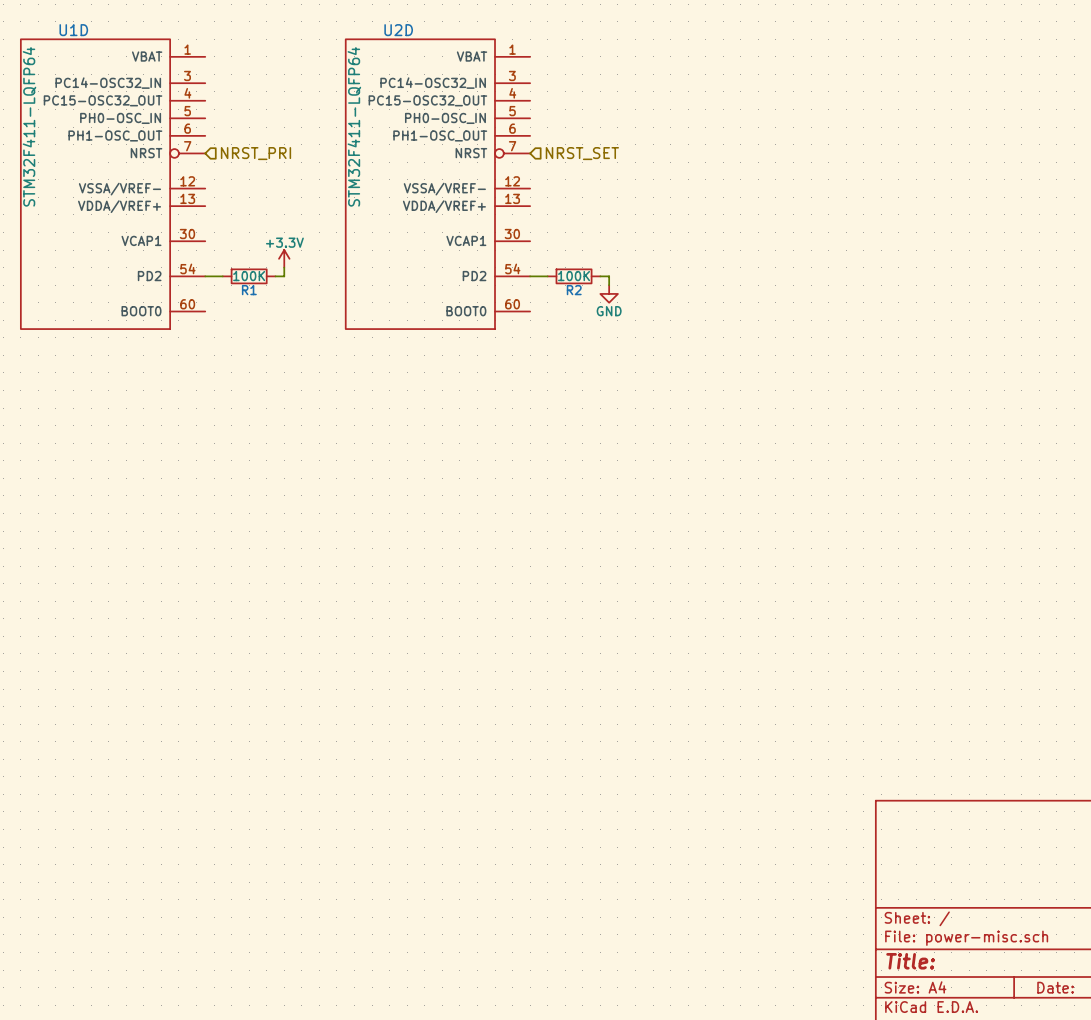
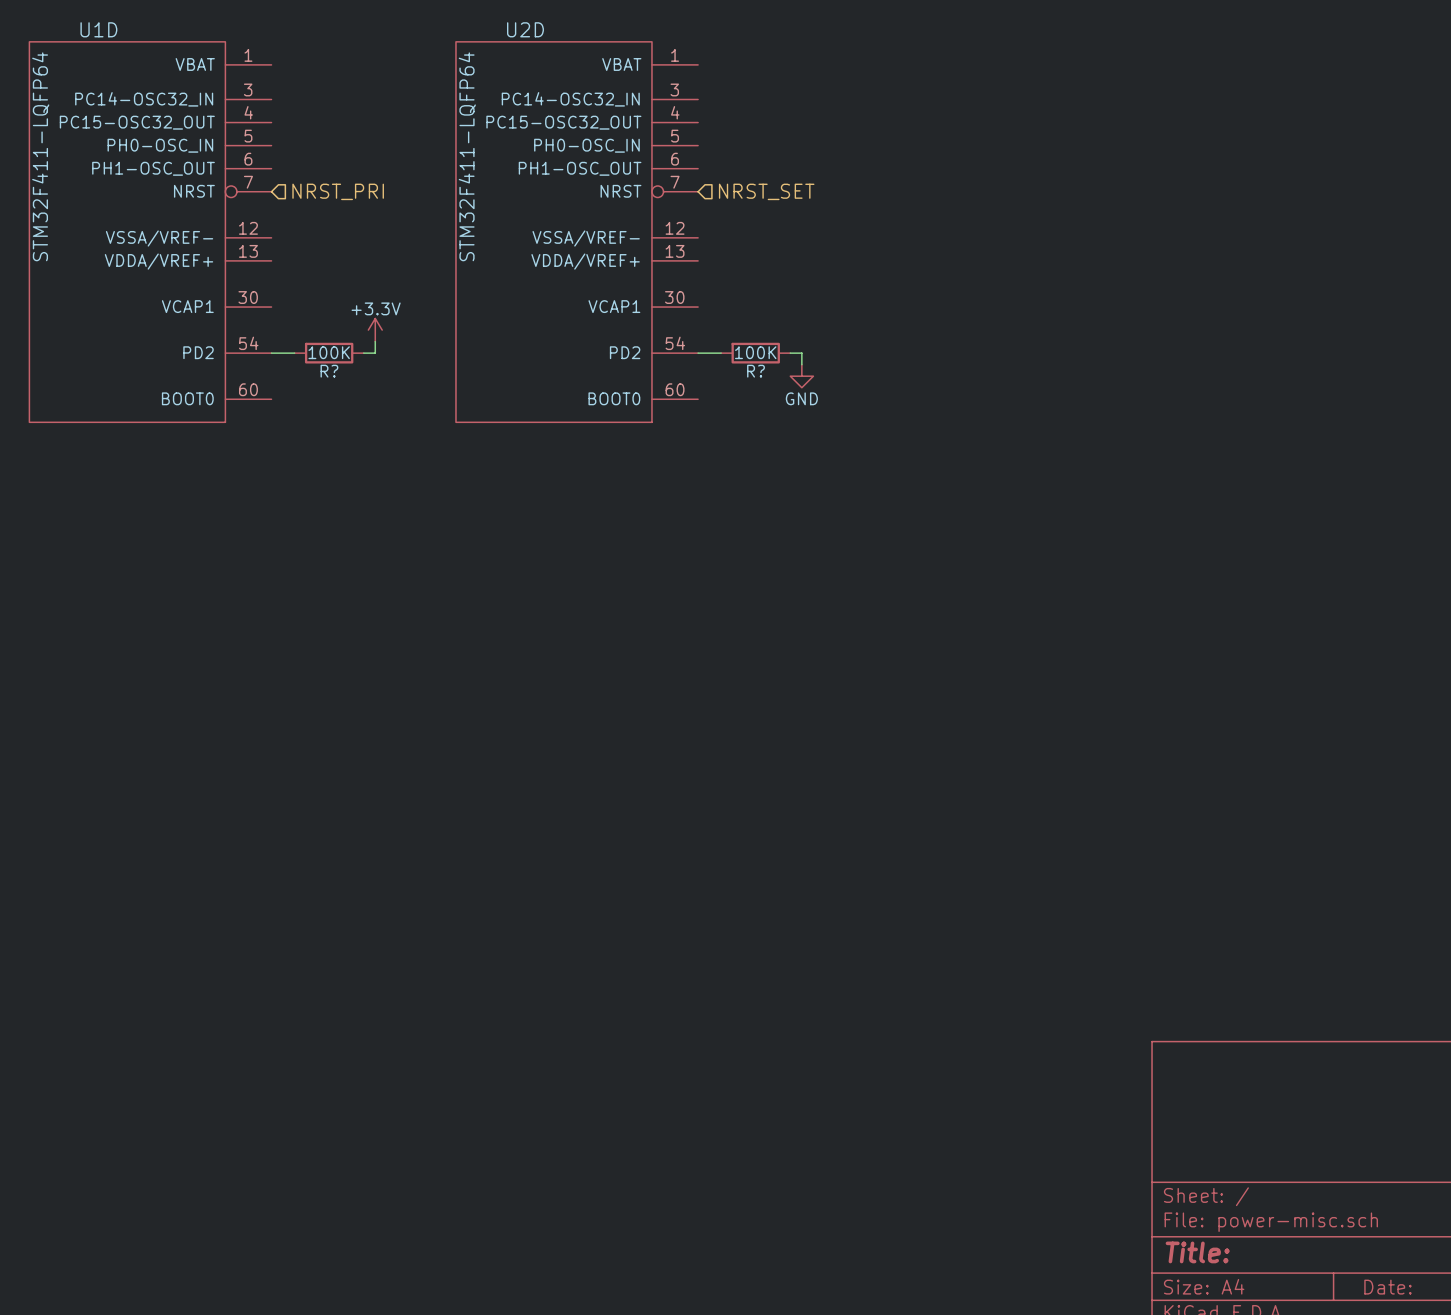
R1 name: R1 (249, 290) -> R? (329, 371)
R2 name: R2 (574, 290) -> R? (756, 371)

